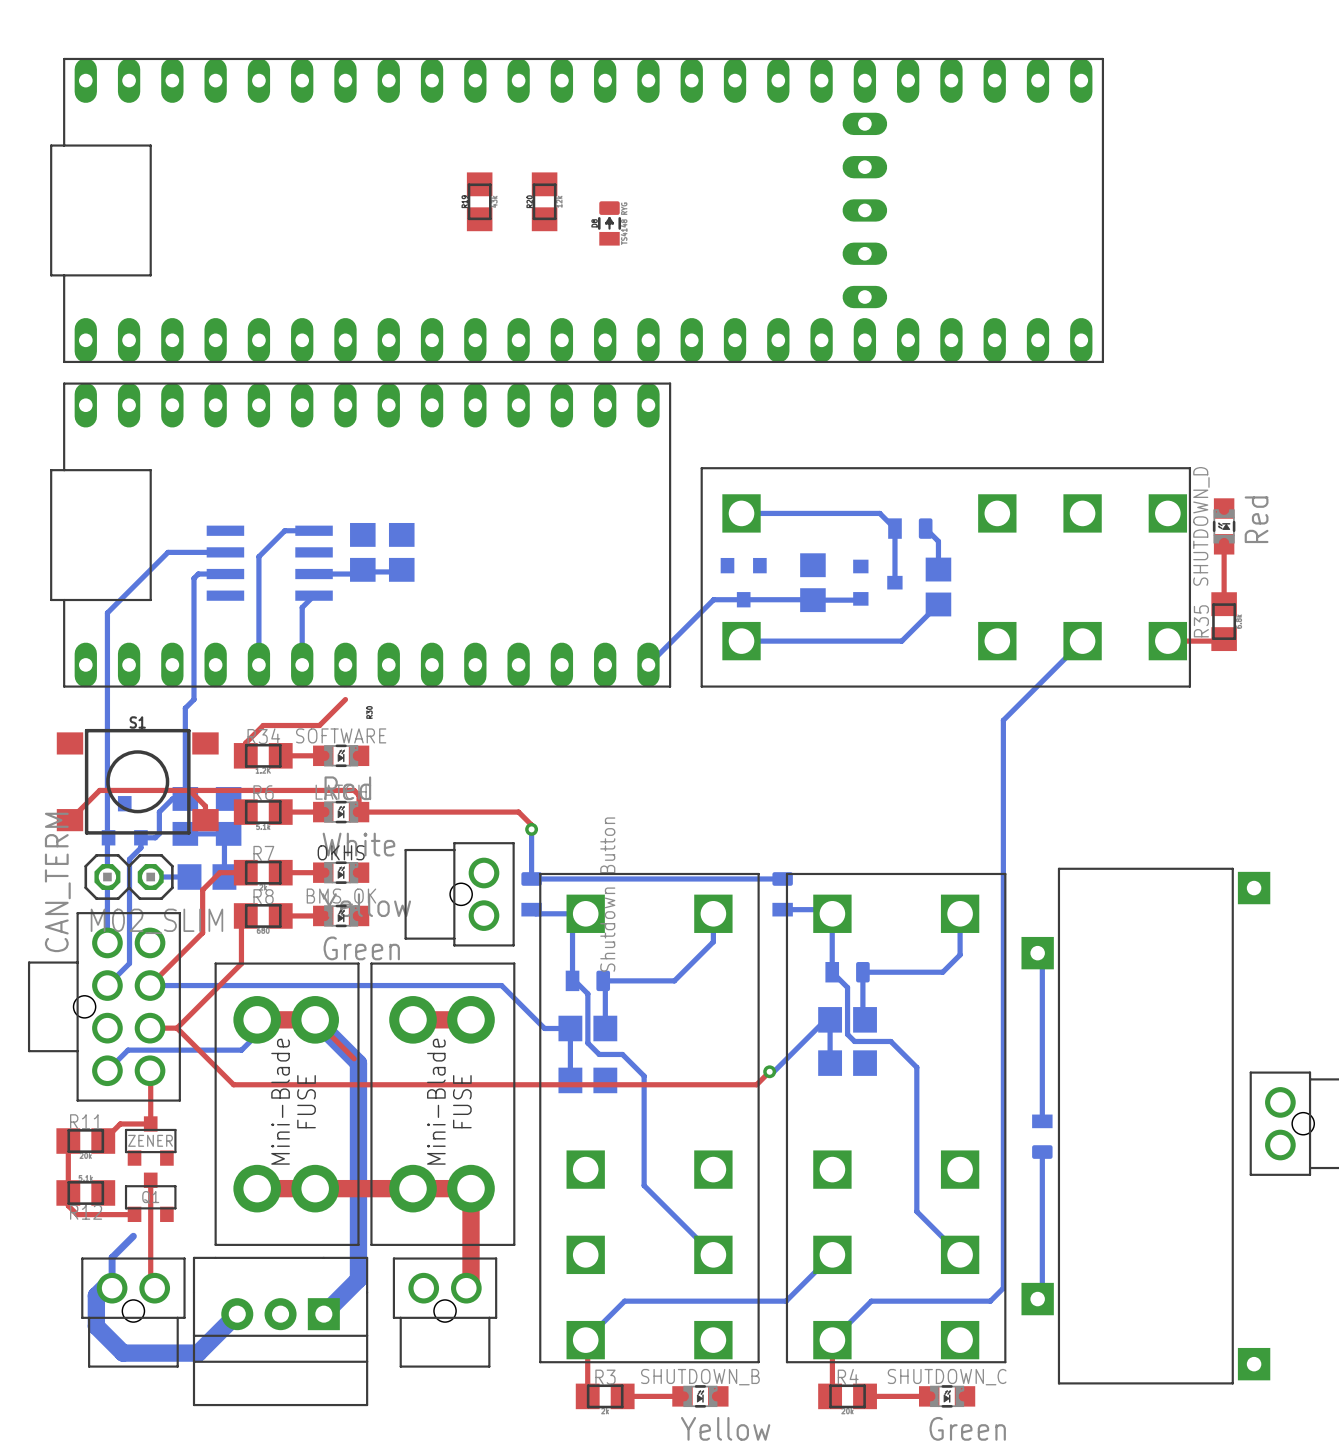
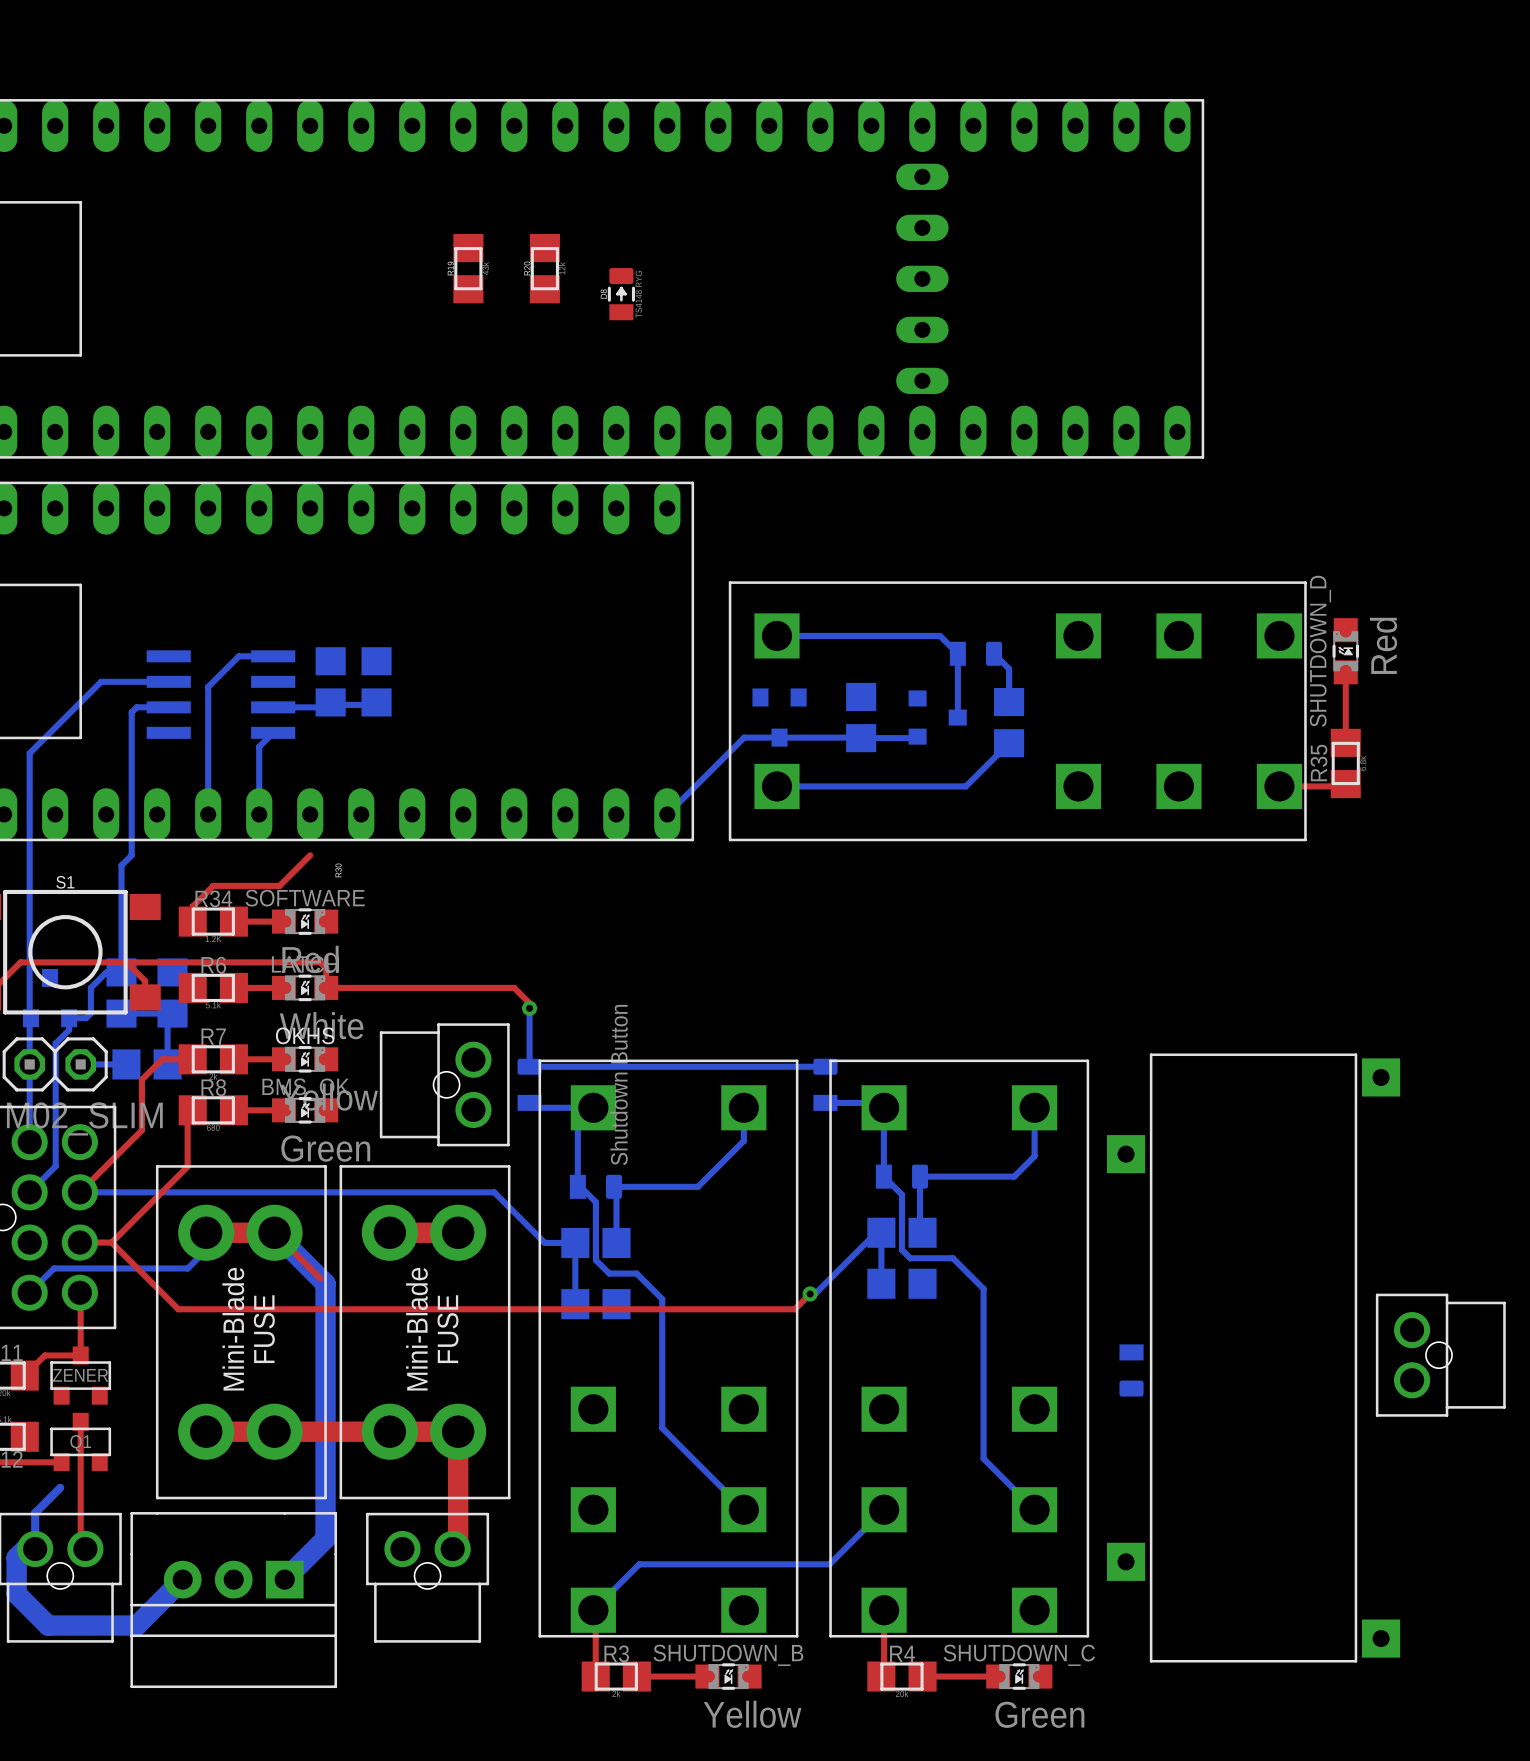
bottom track: (1082, 641) (1003, 720) (1003, 1288) (990, 1301) (871, 1301) (832, 1340) -> none
bottom track: (1037, 953) (1042, 957) (1042, 1121) -> none
bottom track: (1042, 1152) (1042, 1294) (1037, 1299) -> none

